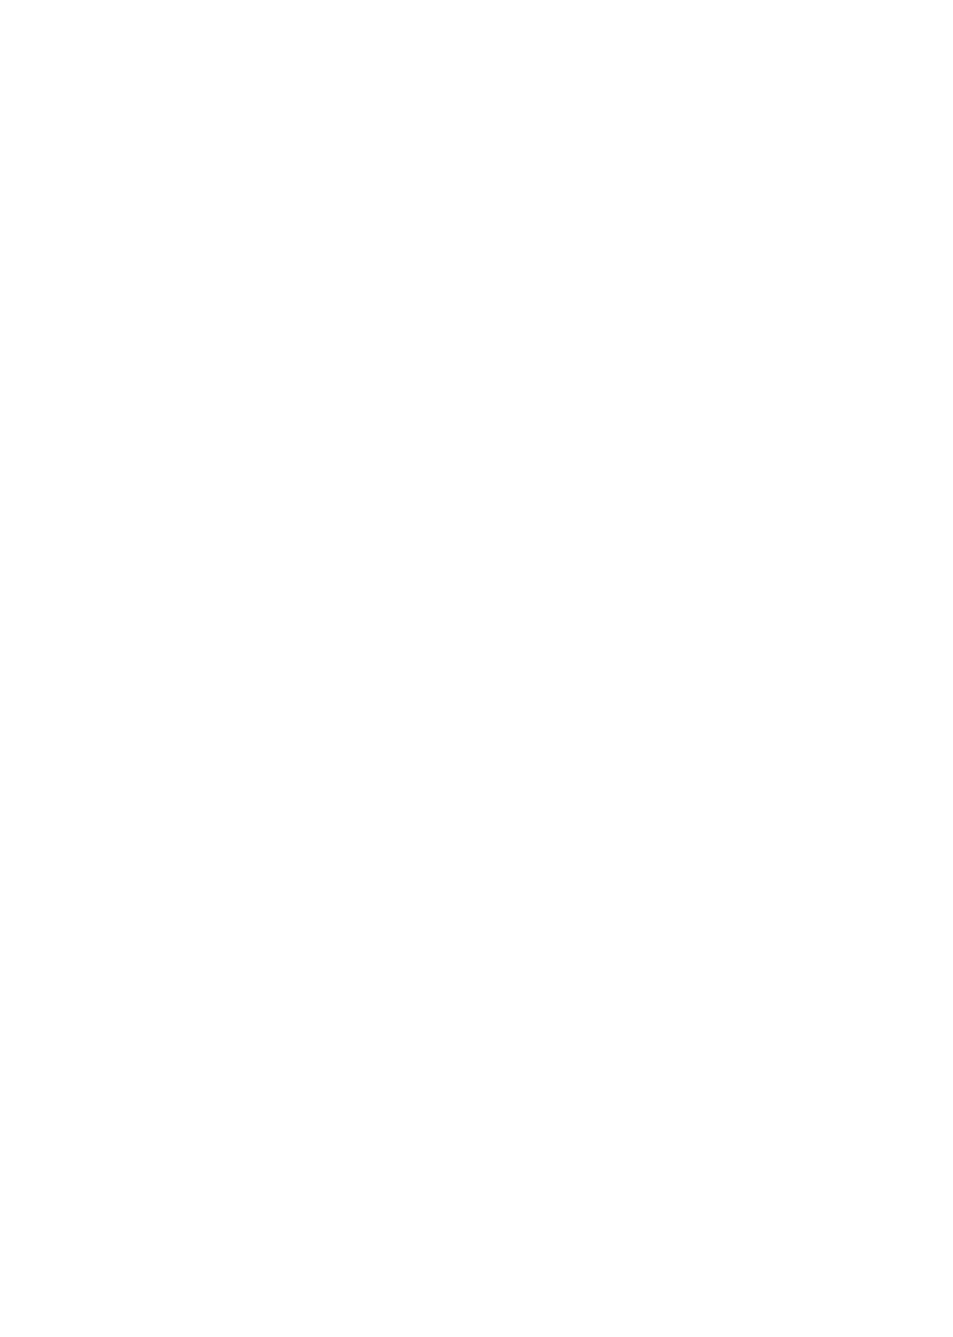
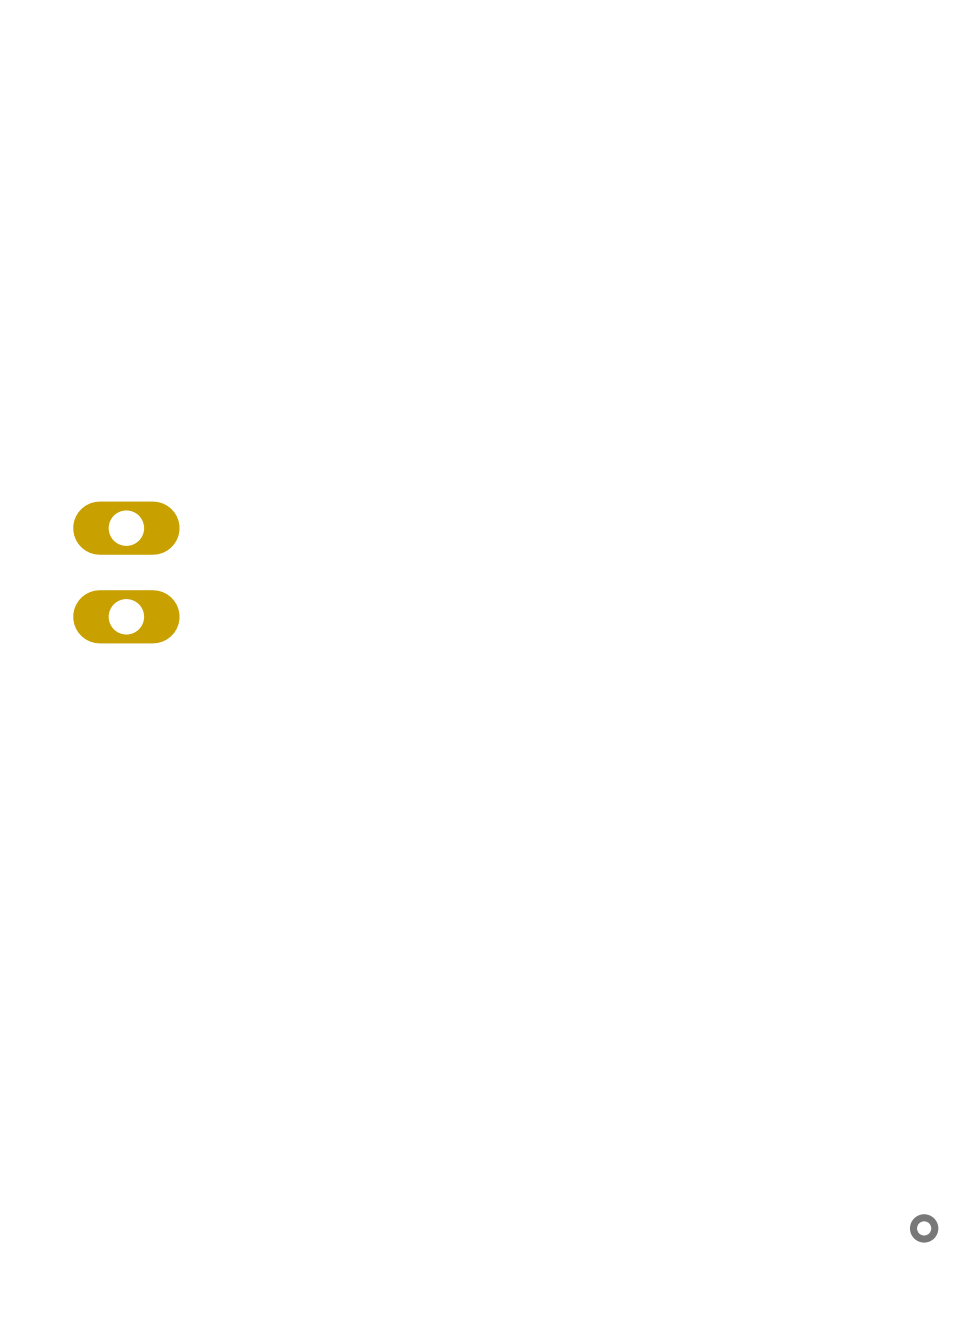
part: none -> (126, 572)
via: none -> (924, 1228)

